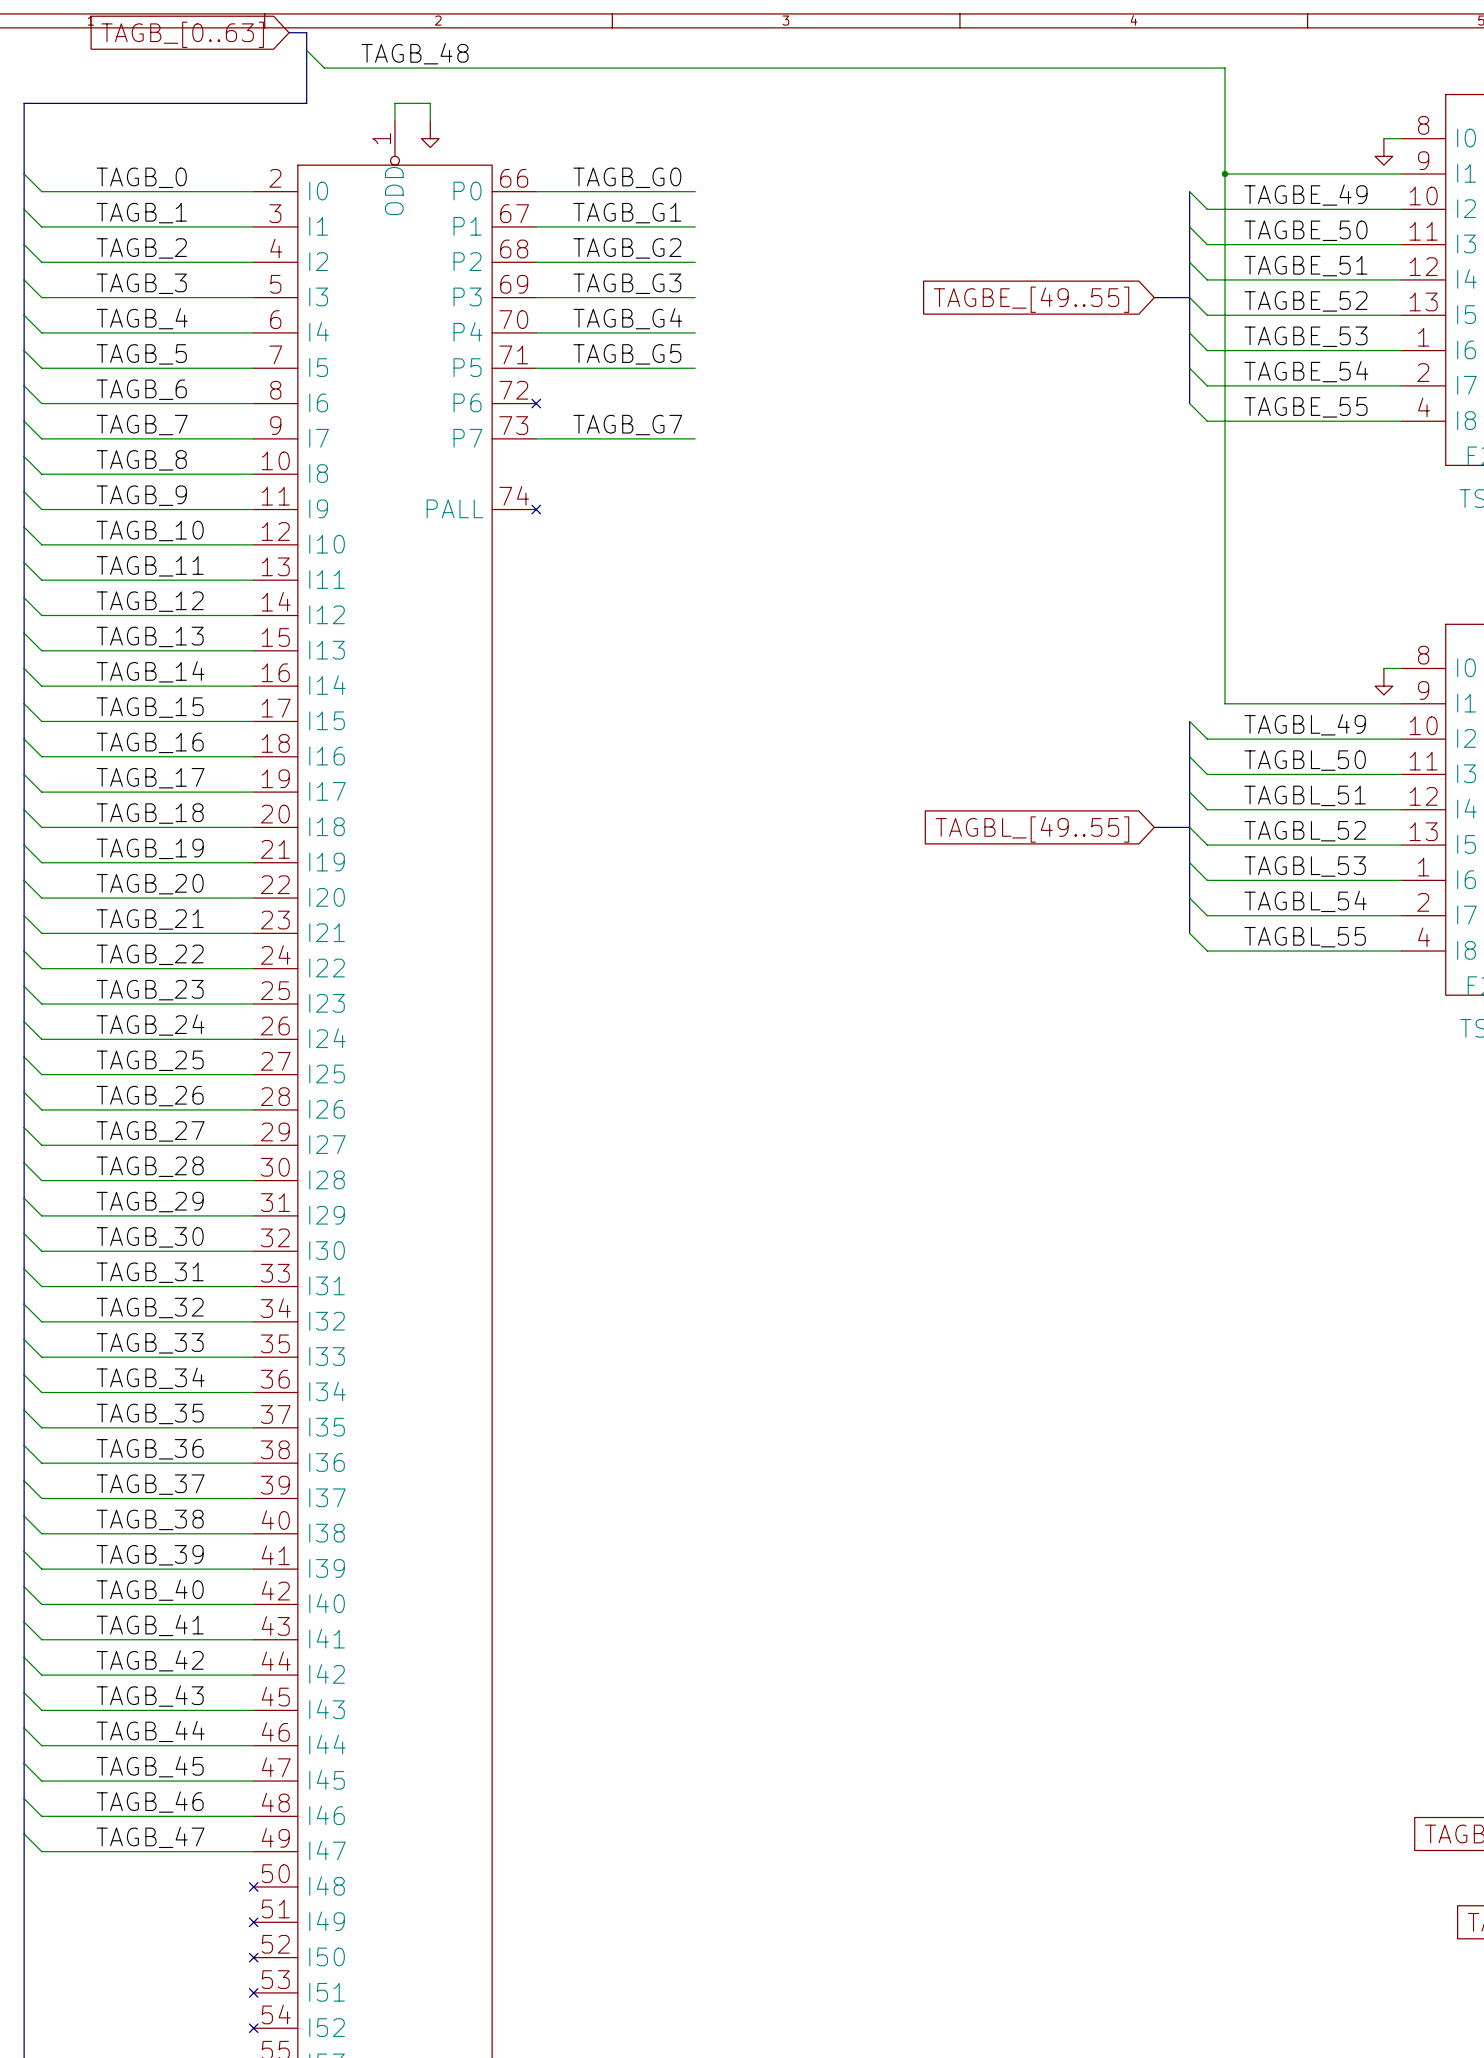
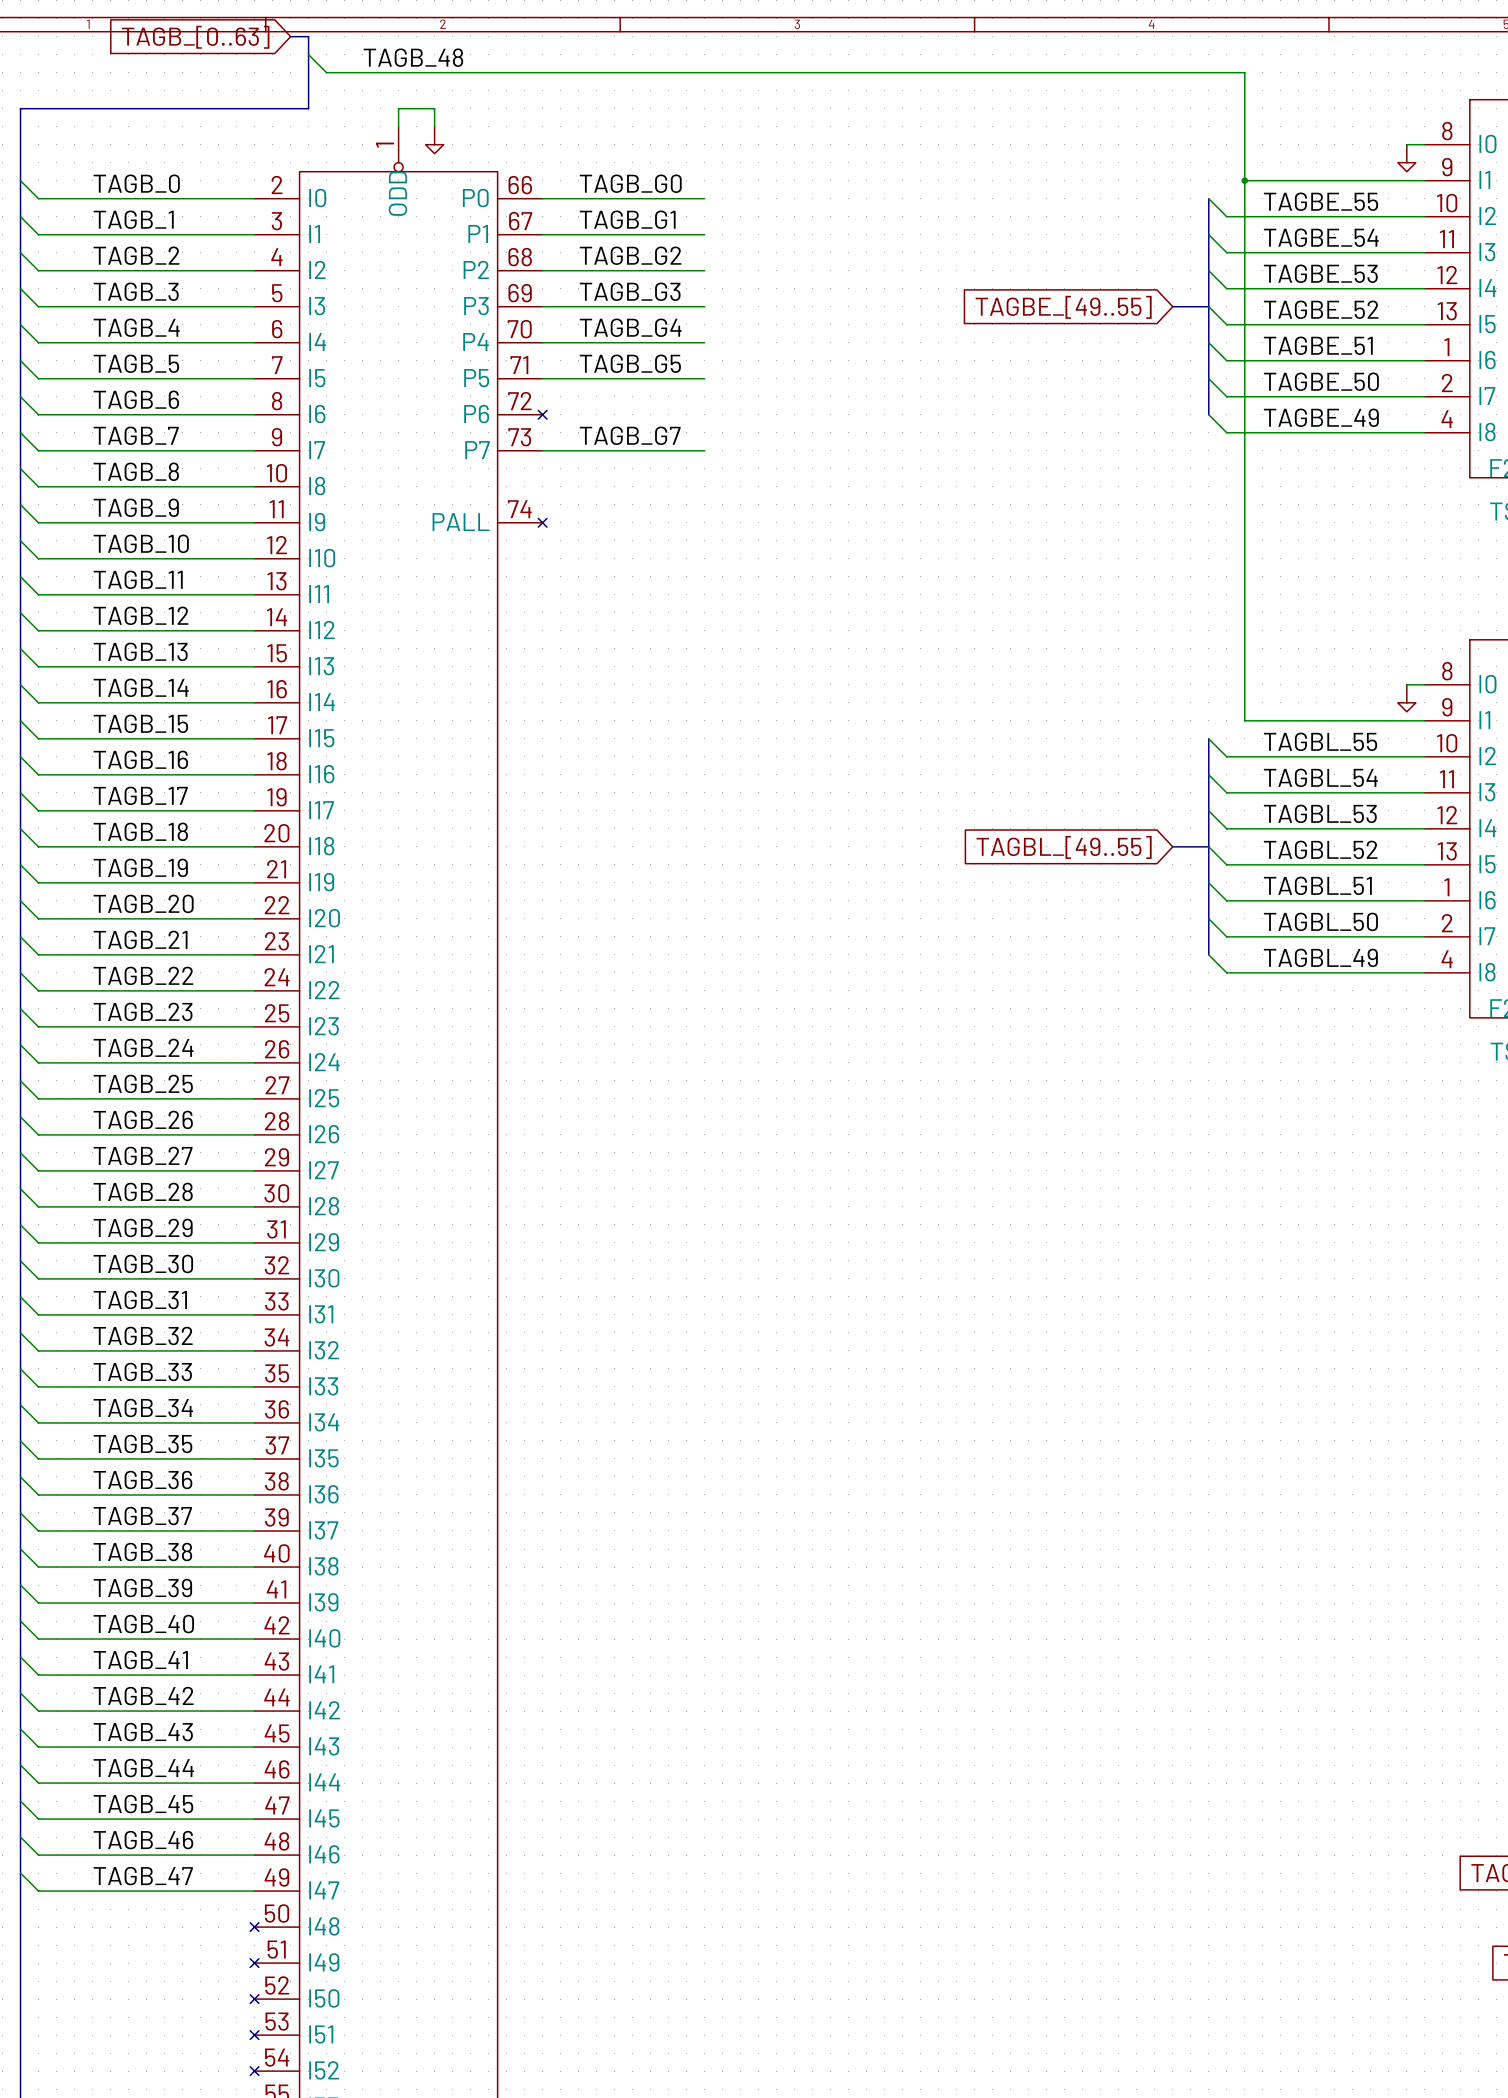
label: TAGBE_49 (1305, 195) -> TAGBE_55 (1320, 201)
label: TAGBE_50 (1305, 230) -> TAGBE_54 (1321, 237)
label: TAGBE_51 (1305, 266) -> TAGBE_53 (1320, 273)
label: TAGBE_53 (1305, 336) -> TAGBE_51 (1318, 345)
label: TAGBE_54 (1306, 371) -> TAGBE_50 (1321, 381)
label: TAGBE_55 (1305, 407) -> TAGBE_49 (1321, 417)
label: TAGBL_49 (1305, 724) -> TAGBL_55 (1320, 741)
label: TAGBL_50 (1305, 760) -> TAGBL_54 (1320, 777)
label: TAGBL_51 (1305, 795) -> TAGBL_53 (1320, 813)
label: TAGBL_53 (1305, 866) -> TAGBL_51 (1317, 885)
label: TAGBL_54 (1305, 901) -> TAGBL_50 (1320, 921)
label: TAGBL_55 (1305, 937) -> TAGBL_49 (1320, 957)

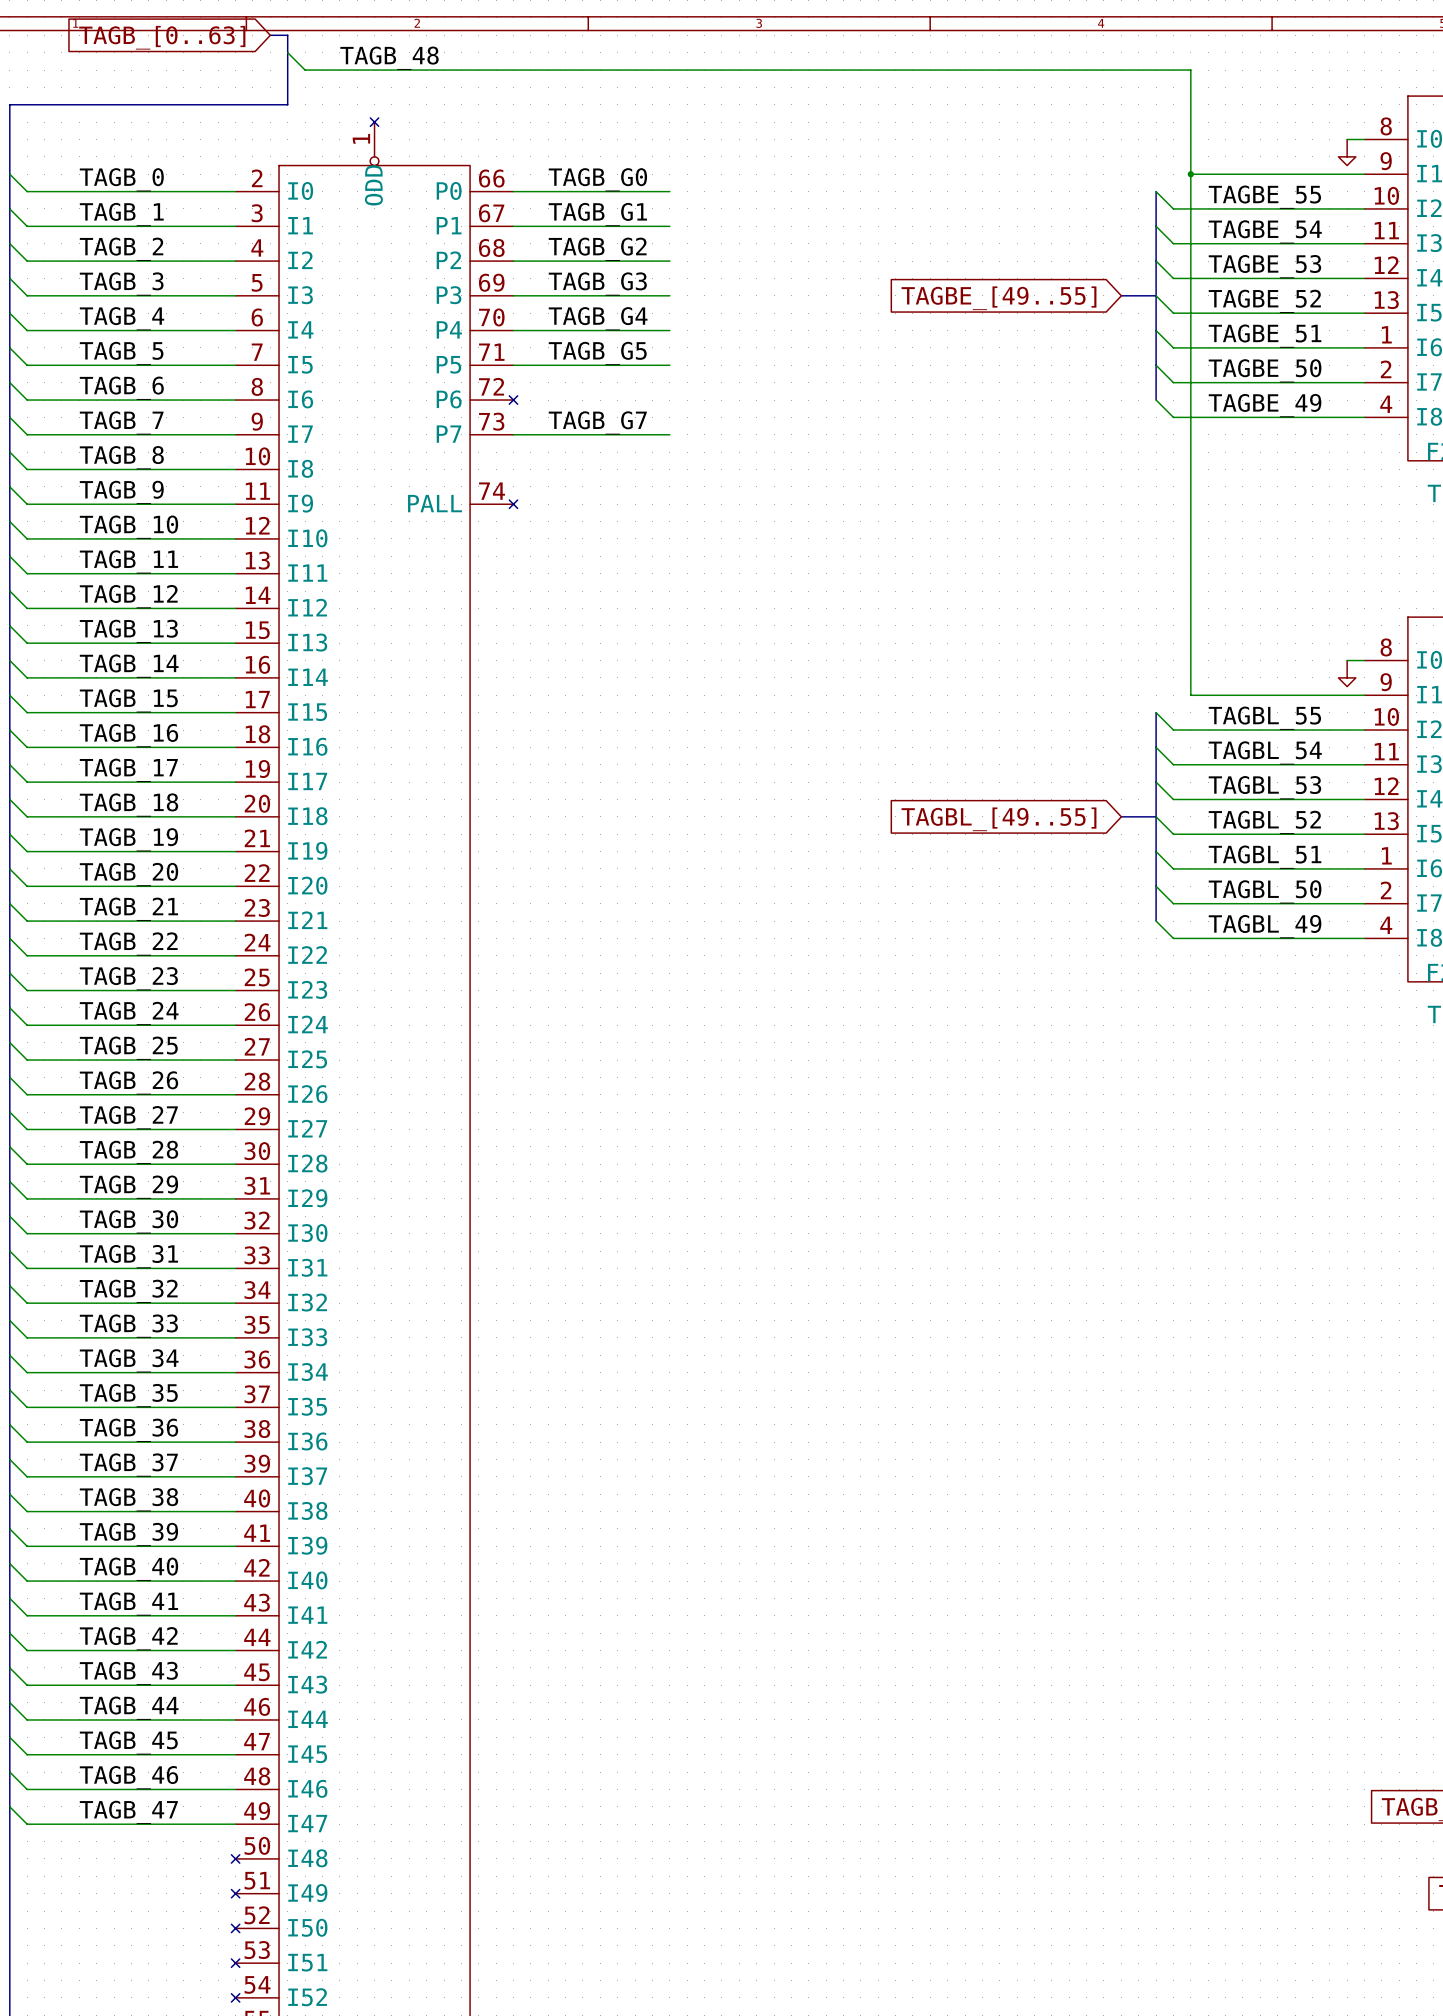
wire: (398, 126) (398, 108) (434, 108) (434, 126) -> none
no-connect mark: none -> (374, 122)
power symbol: (434, 140) -> none

